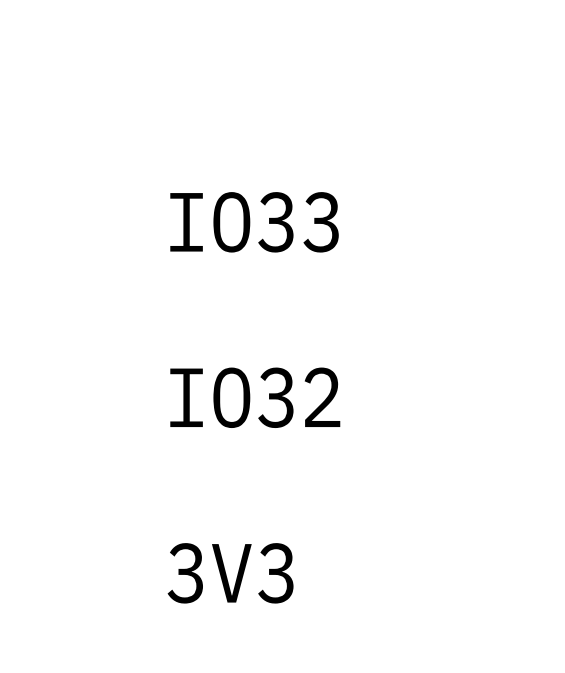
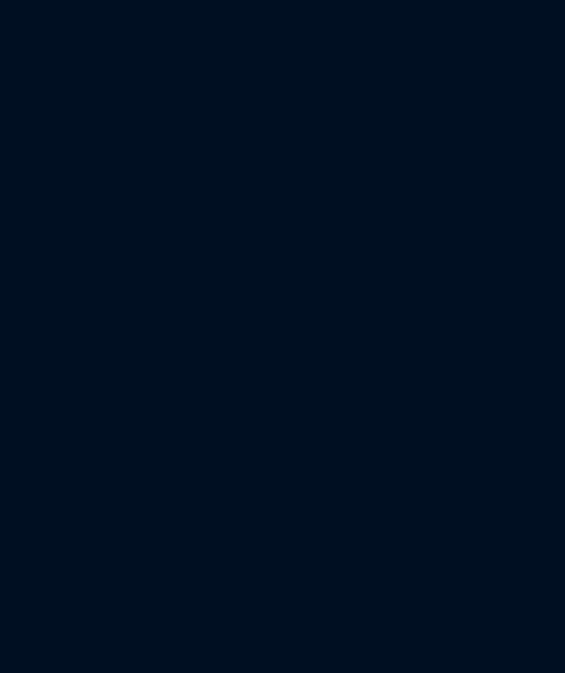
text: IO33 (254, 222) -> none
text: IO32 (255, 397) -> none
text: 3V3 (230, 573) -> none

